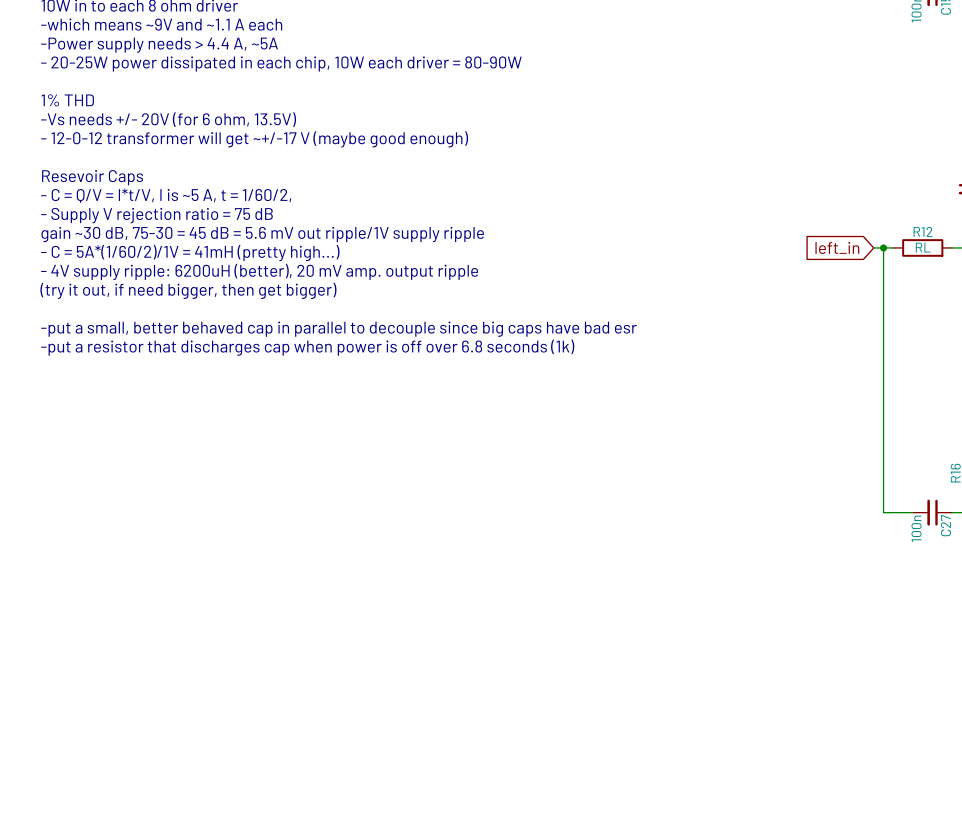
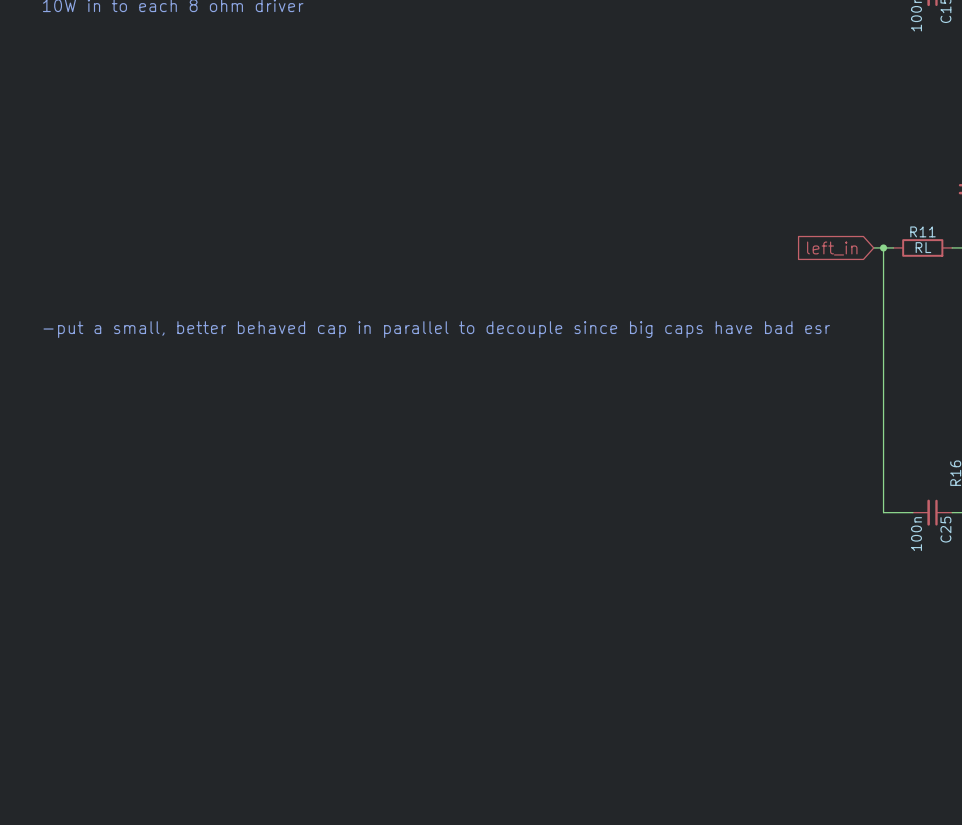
text: -which means ~9V and ~1.1 A each (161, 24) -> none
text: -Power supply needs > 4.4 A, ~5A (159, 45) -> none
text: - 20-25W power dissipated in each chip, 10W each driver = 80-90W (281, 64) -> none
text: 1% THD (67, 100) -> none
text: -Vs needs +/- 20V (for 6 ohm, 13.5V) (168, 119) -> none
text: - 12-0-12 transformer will get ~+/-17 V (maybe good enough) (254, 139) -> none
text: Resevoir Caps (92, 177) -> none
text: - C = Q/V = I*t/V, I is ~5 A, t = 1/60/2, (166, 195) -> none
text: - Supply V rejection ratio = 75 dB (156, 215) -> none
R12 name: R12 (923, 231) -> R11 (922, 231)
text: gain ~30 dB, 75-30 = 45 dB = 5.6 mV out ripple/1V supply ripple (262, 234) -> none
text: - C = 5A*(1/60/2)/1V = 41mH (pretty high...) (190, 253) -> none
text: - 4V supply ripple: 6200uH (better), 20 mV amp. output ripple (259, 271) -> none
text: (try it out, if need bigger, then get bigger) (188, 290) -> none
text: -put a resistor that discharges cap when power is off over 6.8 seconds (1k) (307, 347) -> none
C27 name: C27 (945, 525) -> C25 (945, 529)

